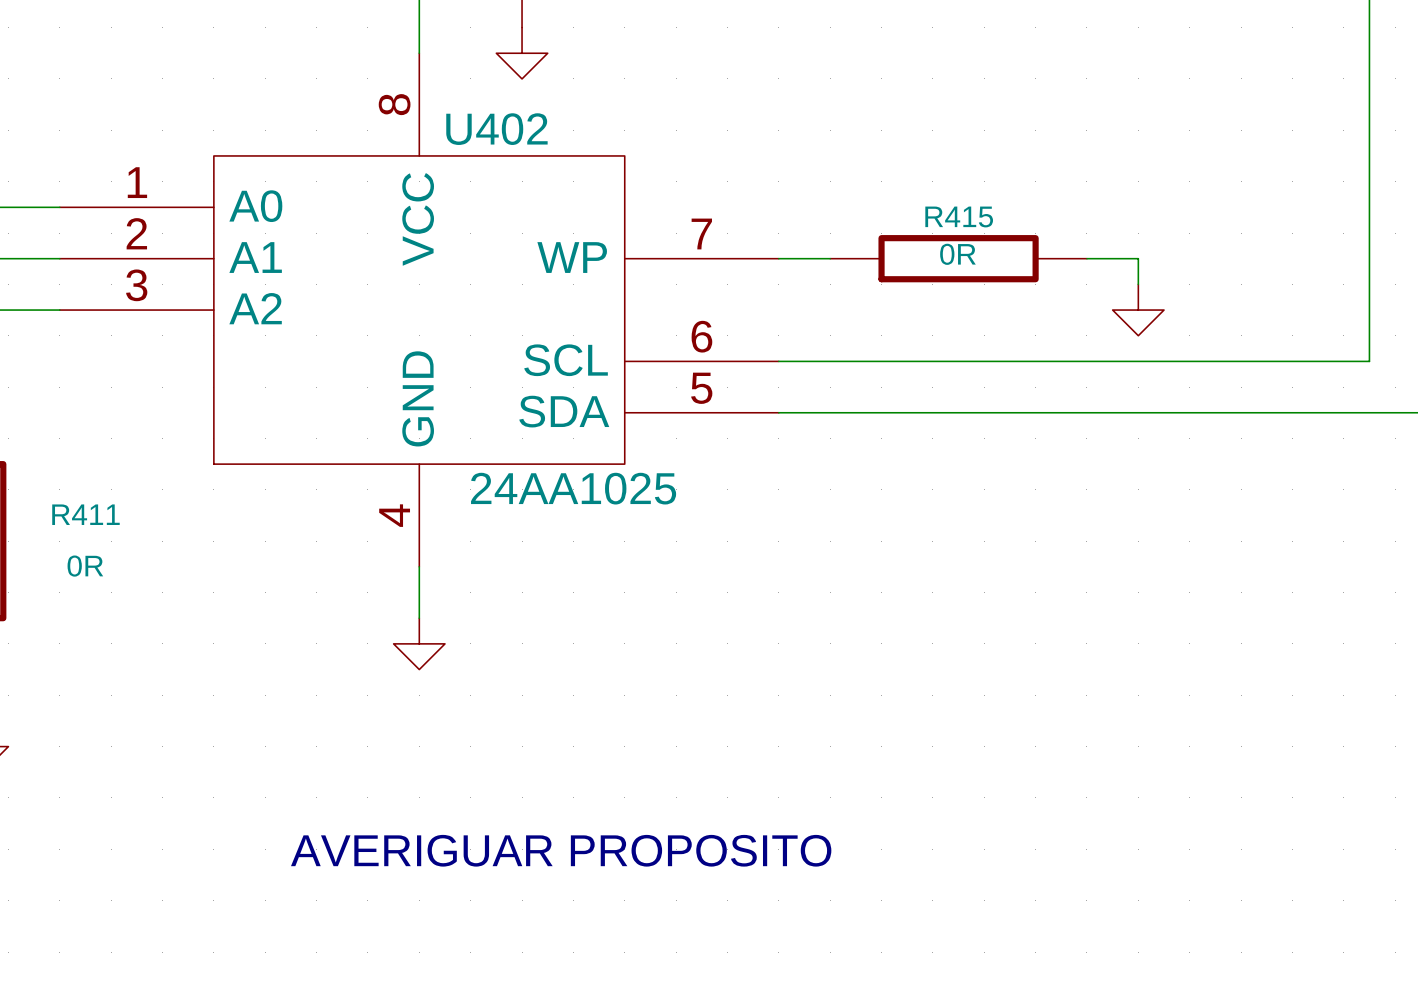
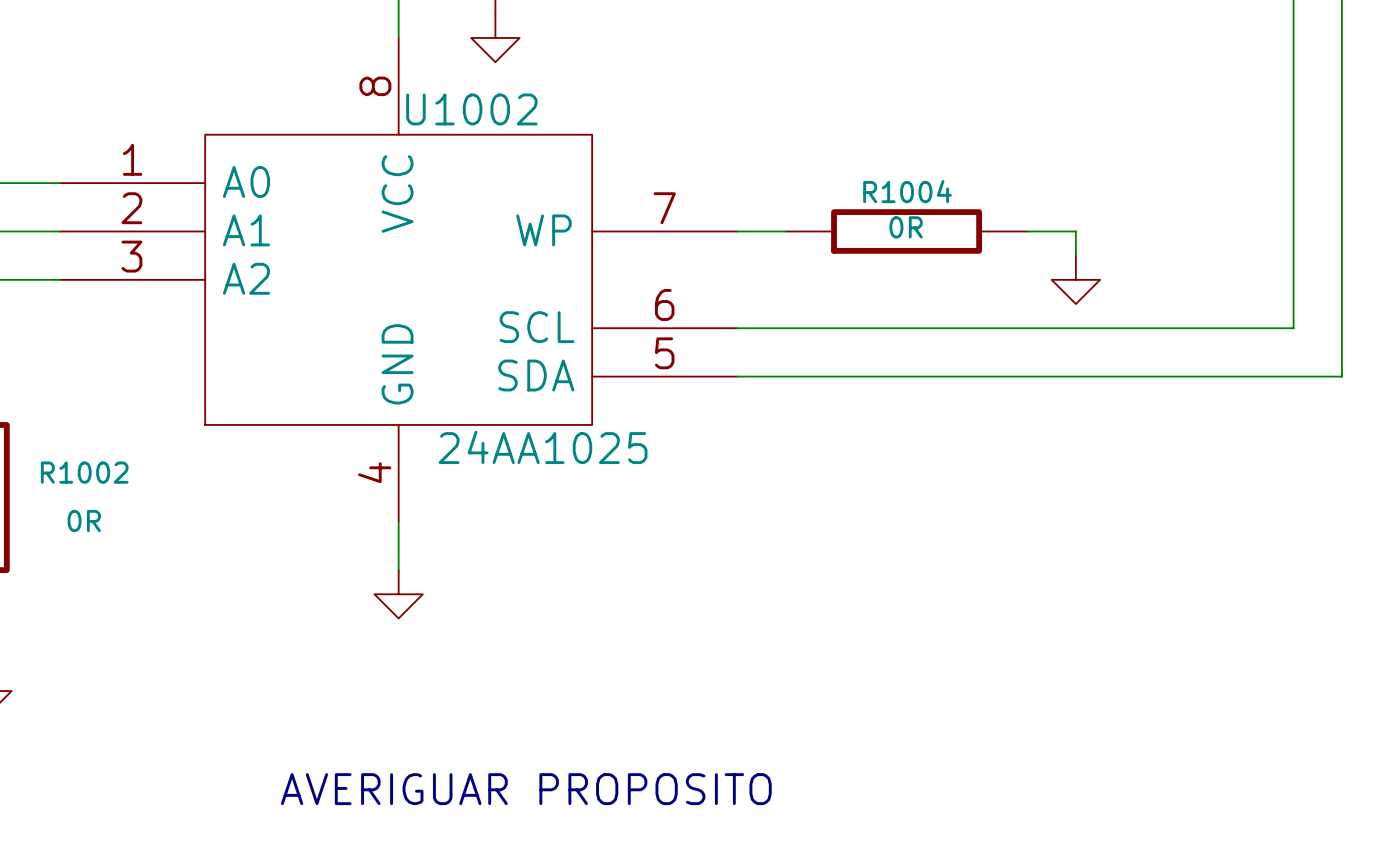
U402 name: U402 (496, 129) -> U1002 (471, 109)
R415 name: R415 (959, 216) -> R1004 (907, 191)
R411 name: R411 (85, 514) -> R1002 (84, 472)

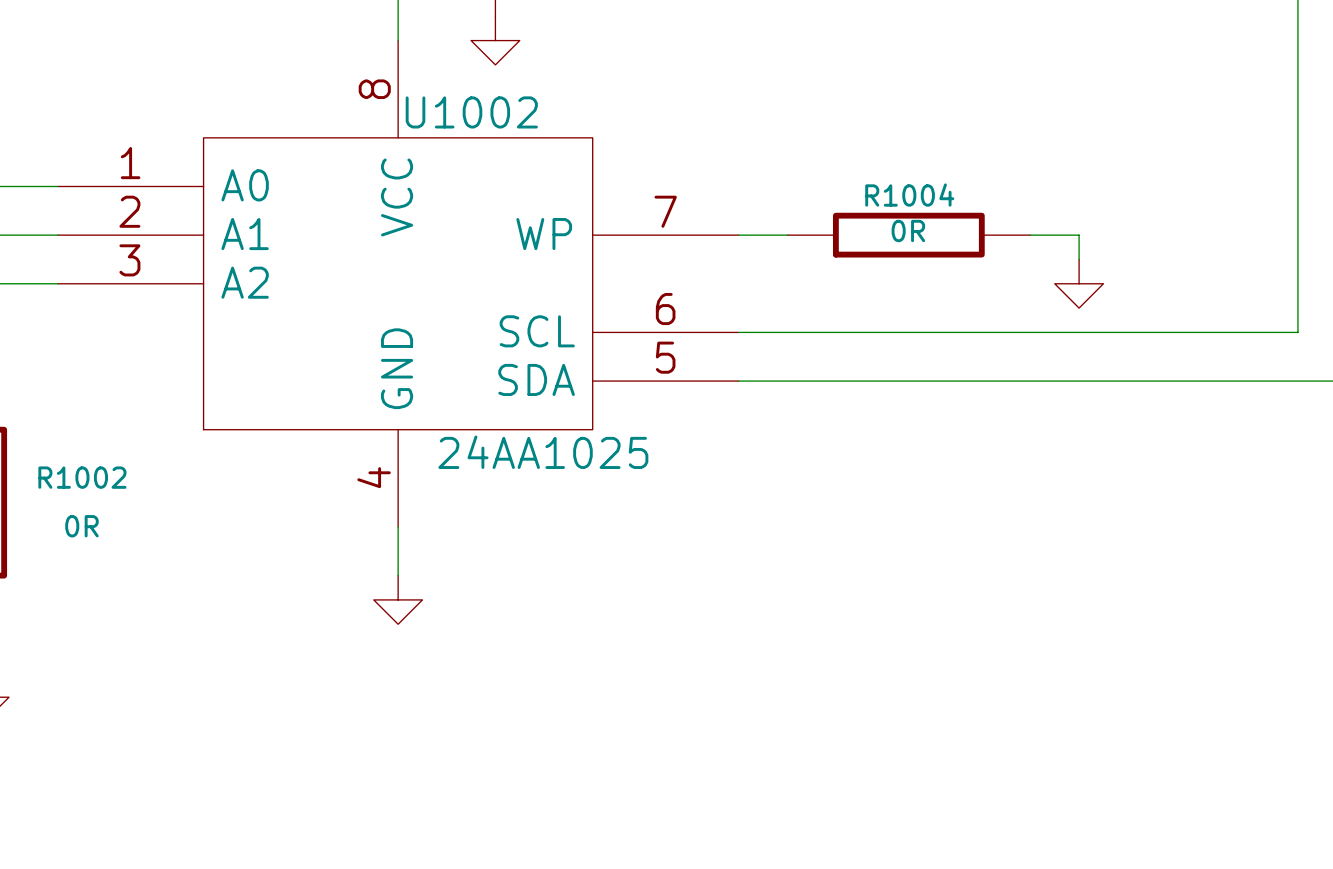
text: AVERIGUAR PROPOSITO (526, 789) -> none

